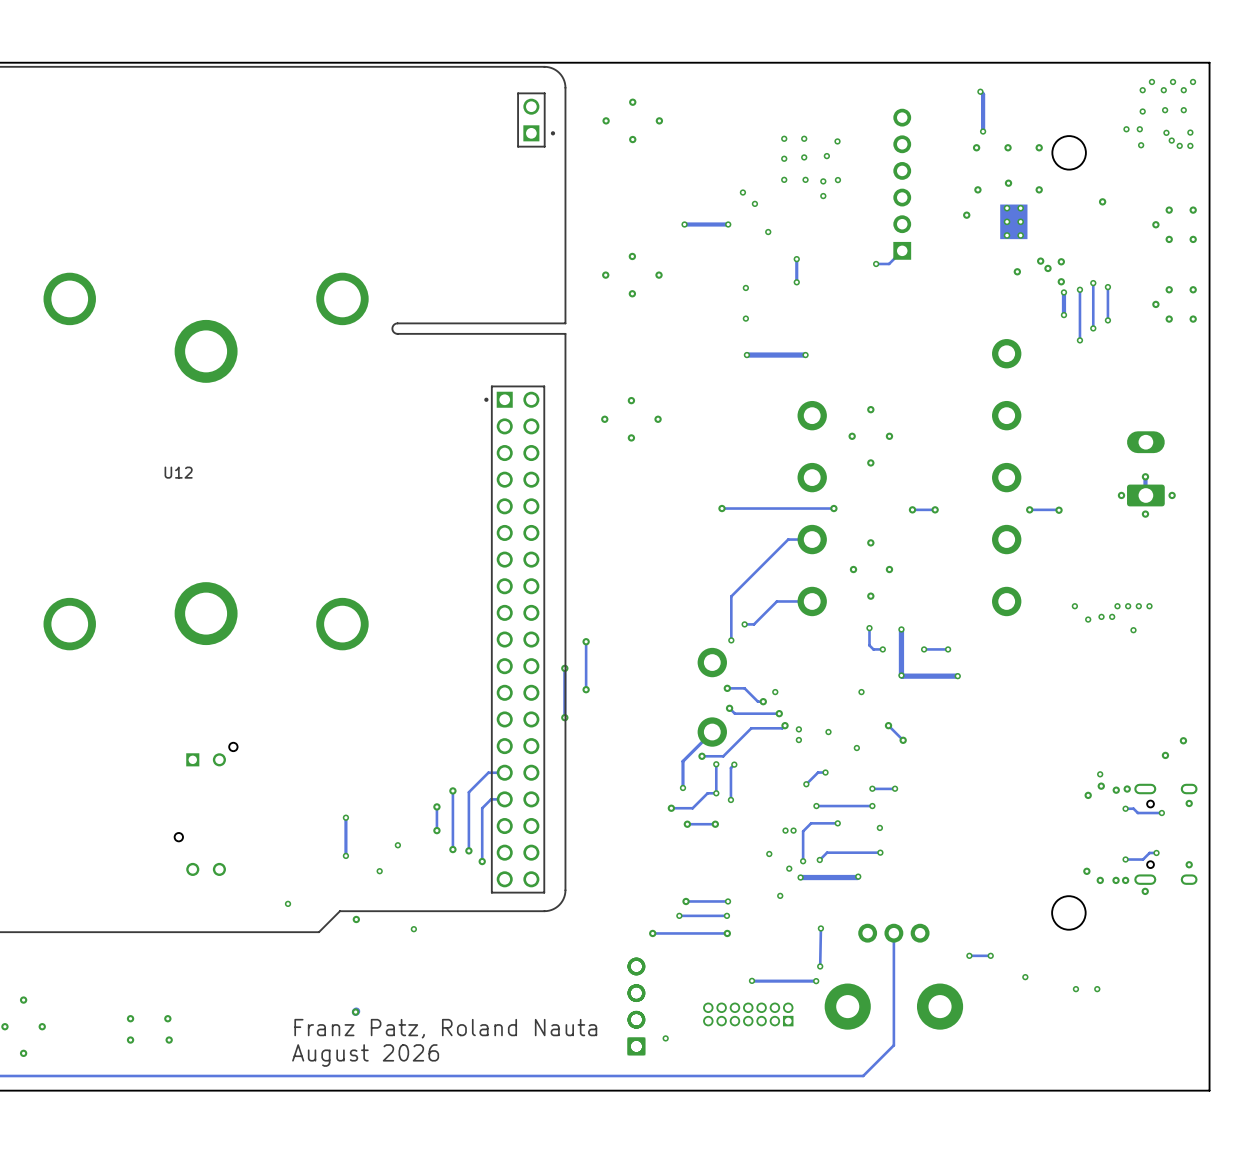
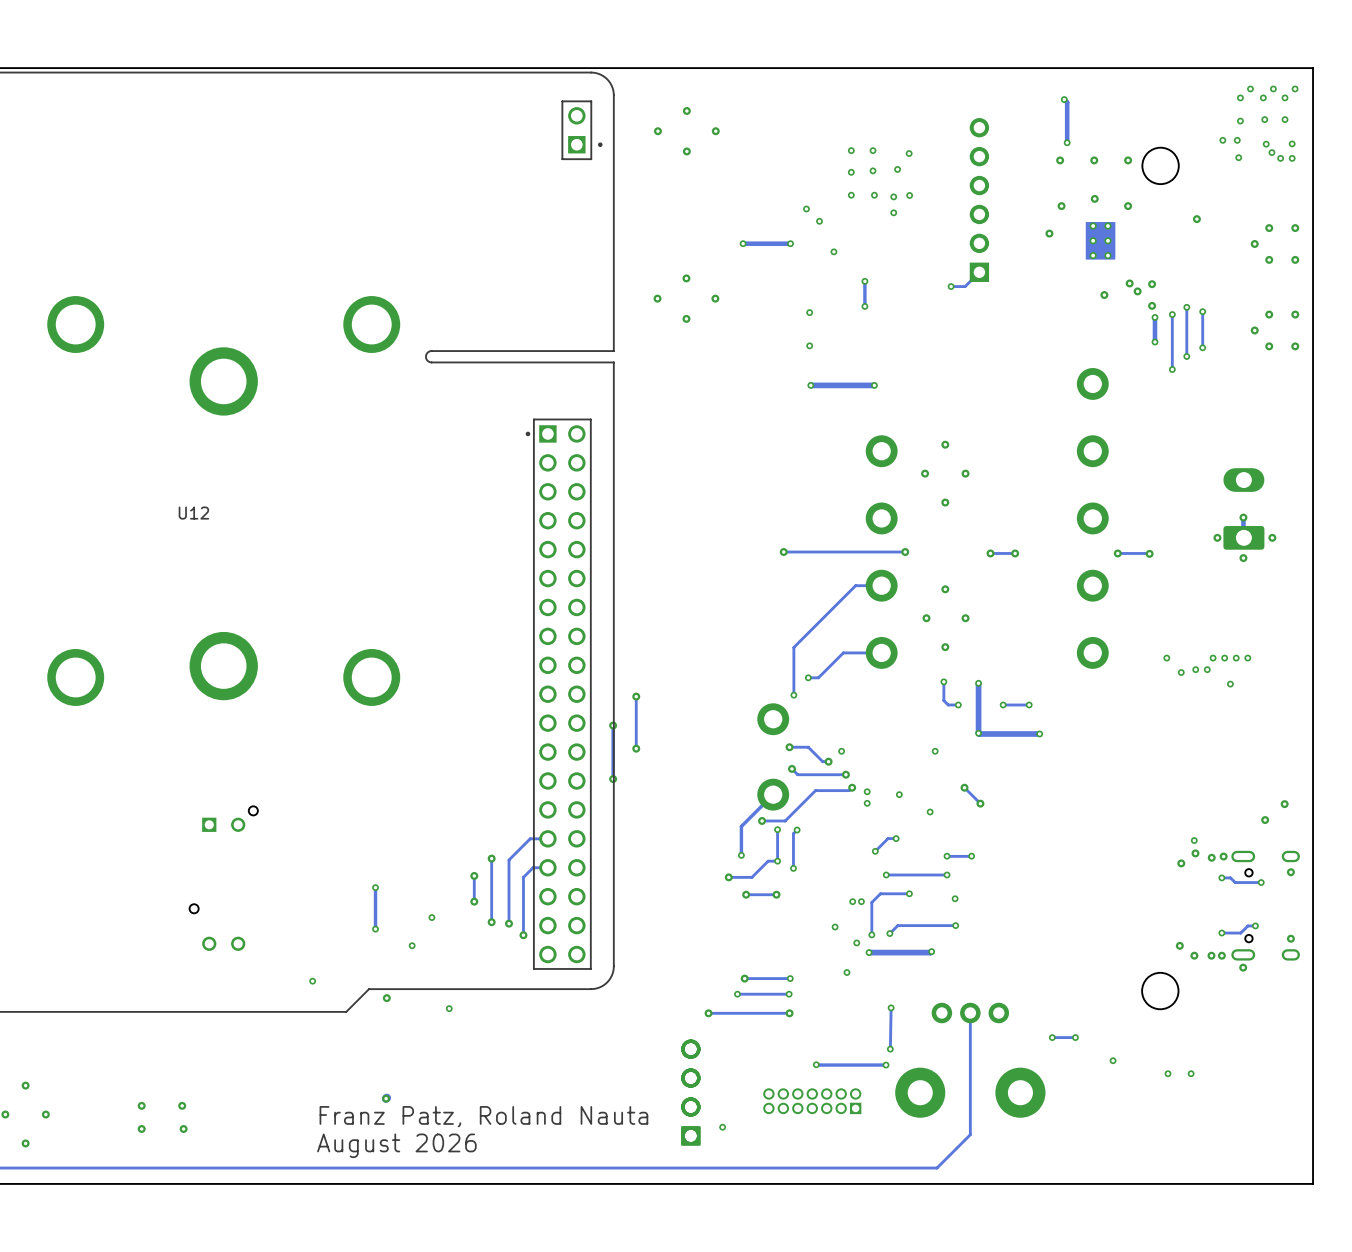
via: (631, 400) -> none
via: (604, 419) -> none
via: (658, 419) -> none
via: (631, 437) -> none

